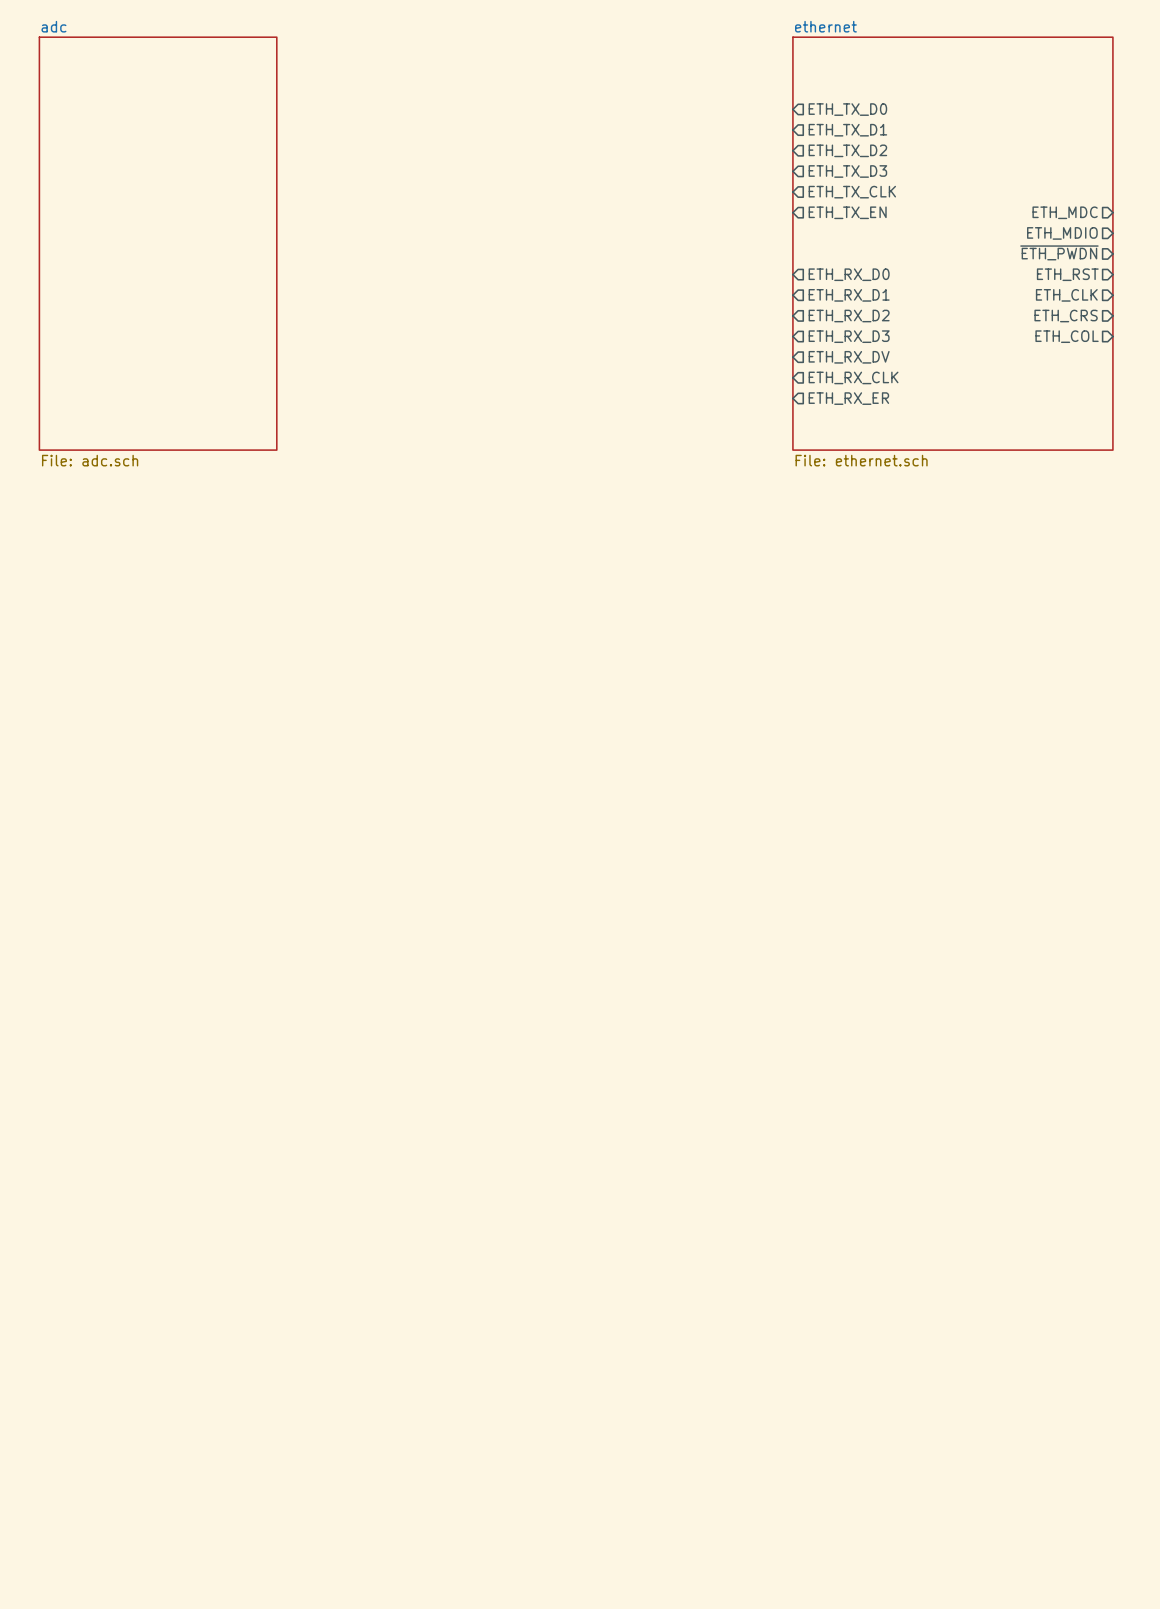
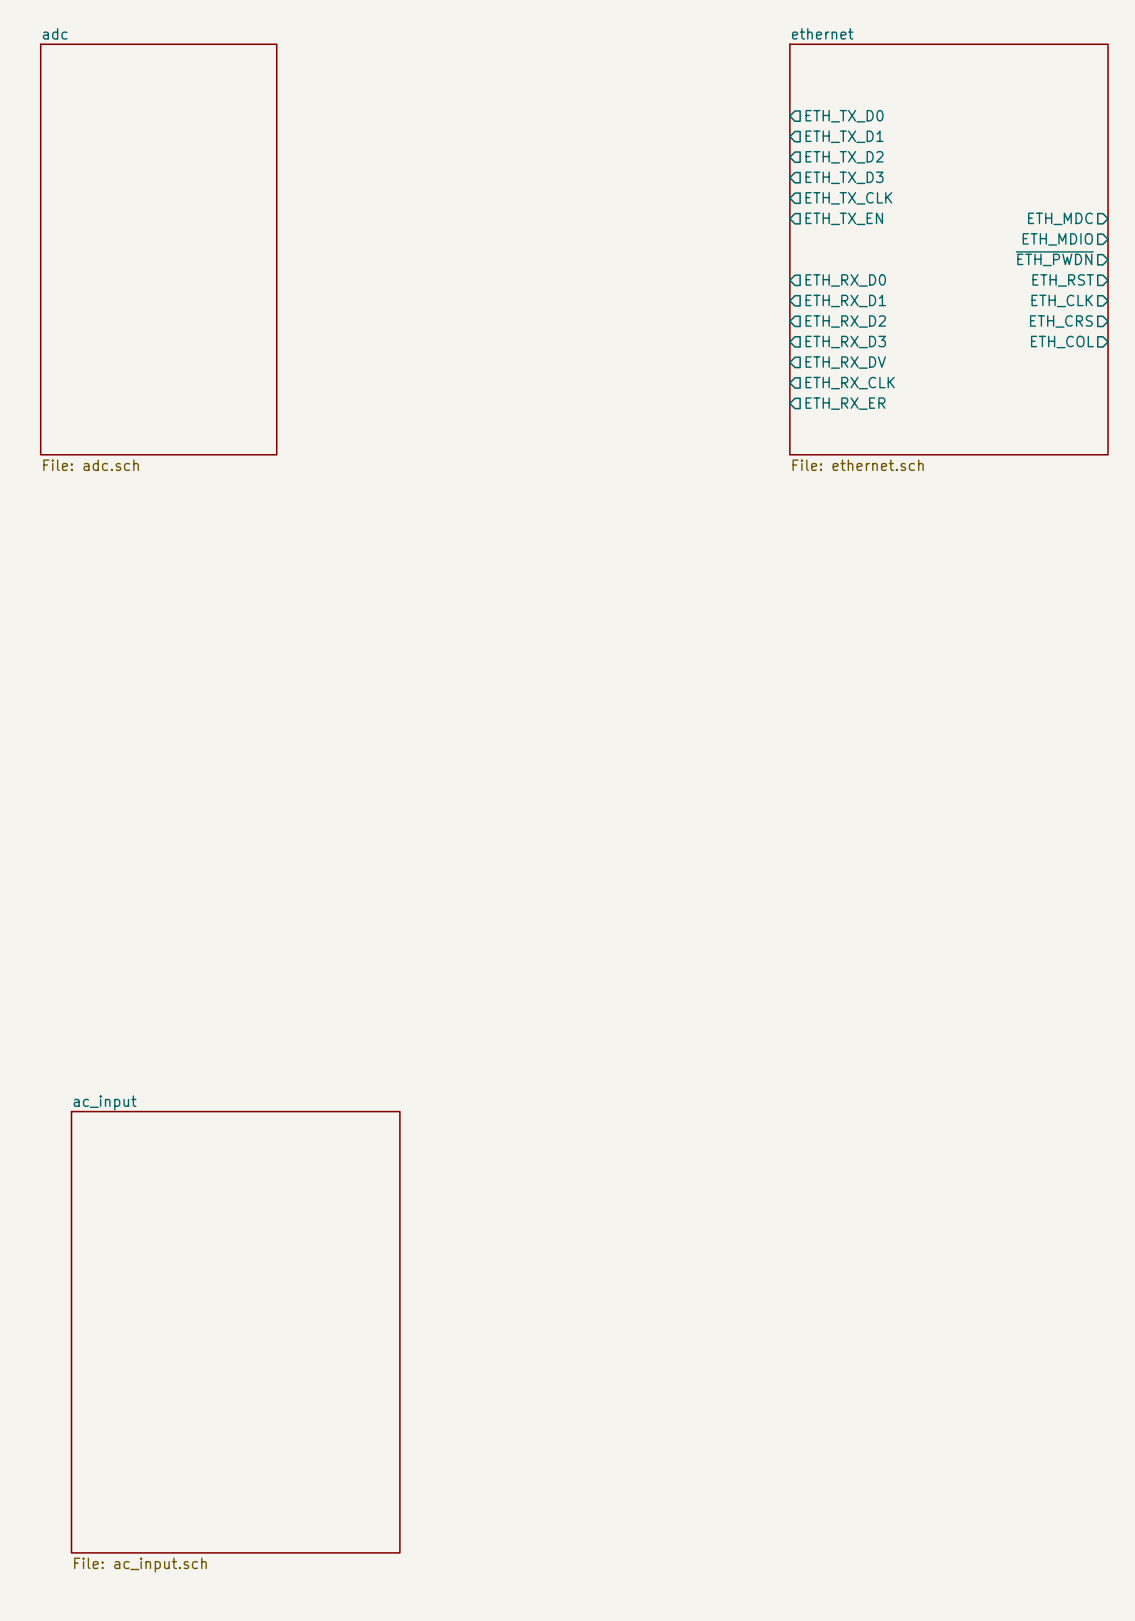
sheet ac_input: none -> File: ac_input.sch (235, 1332)

